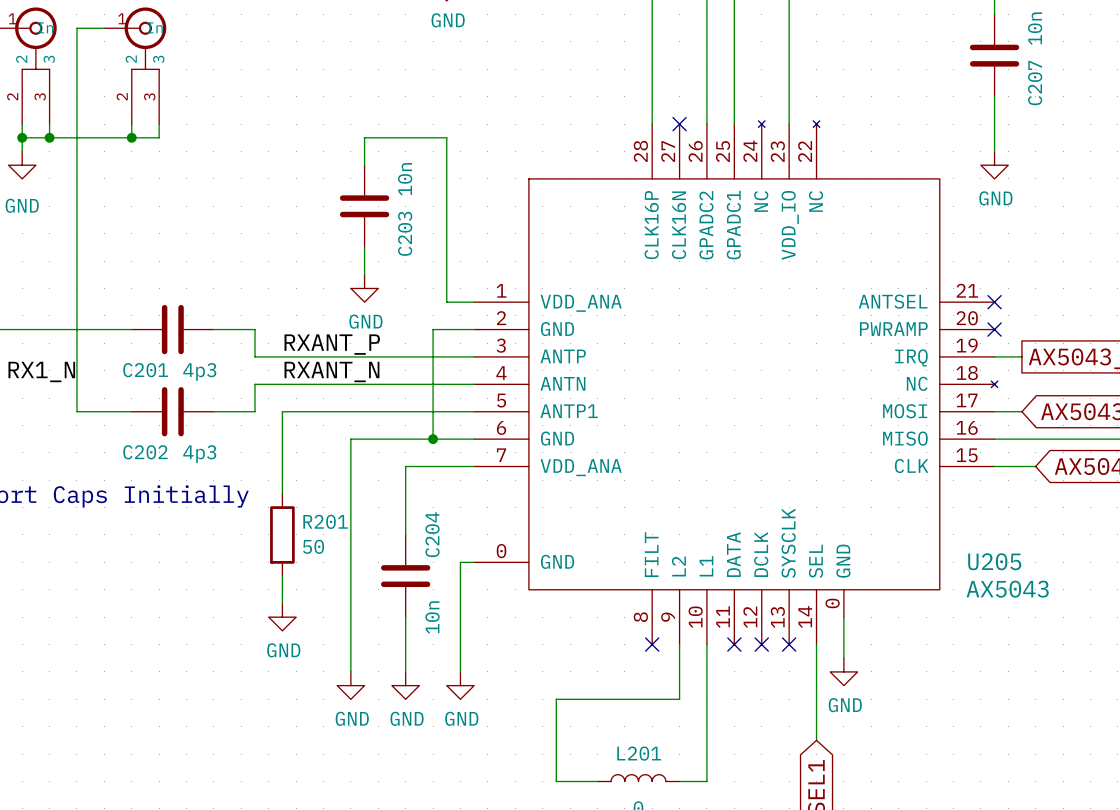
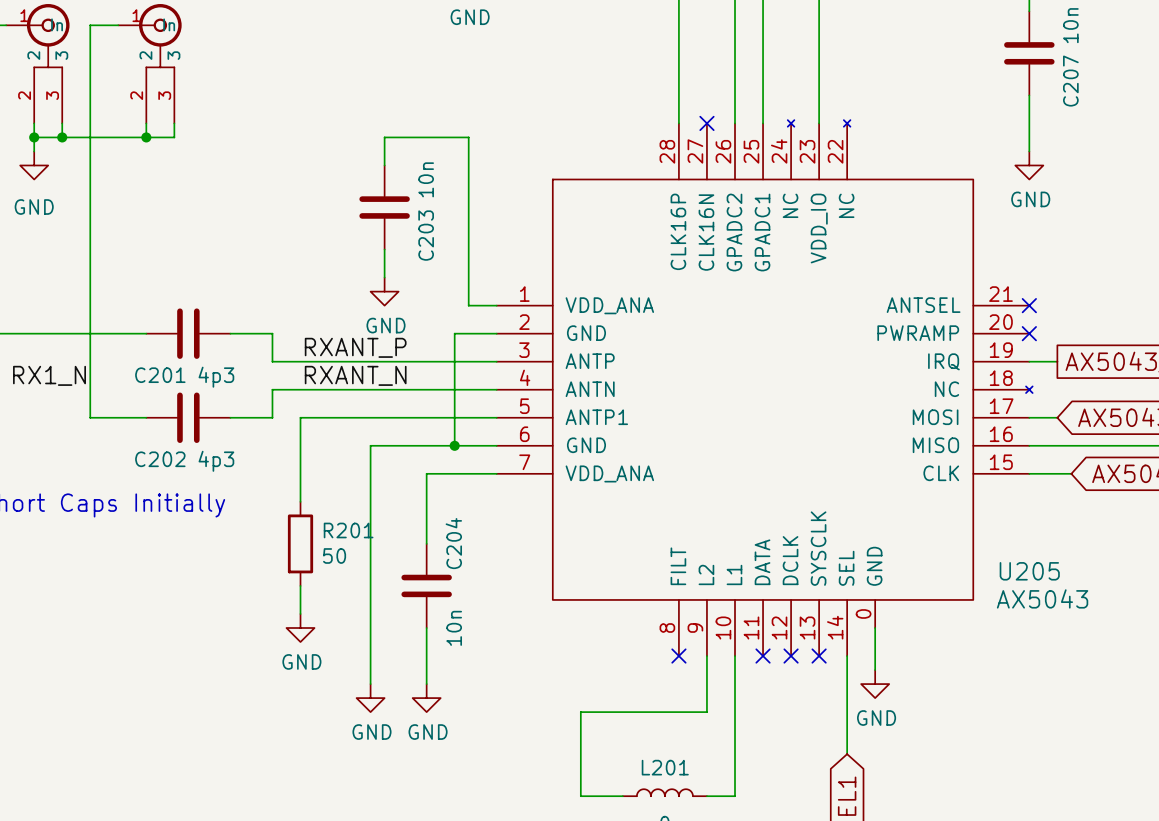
U205 symbol: [474, 120, 998, 645] -> [496, 120, 1033, 657]
wire: (474, 562) (460, 562) (460, 671) -> none
power symbol: GND (460, 685) -> none

